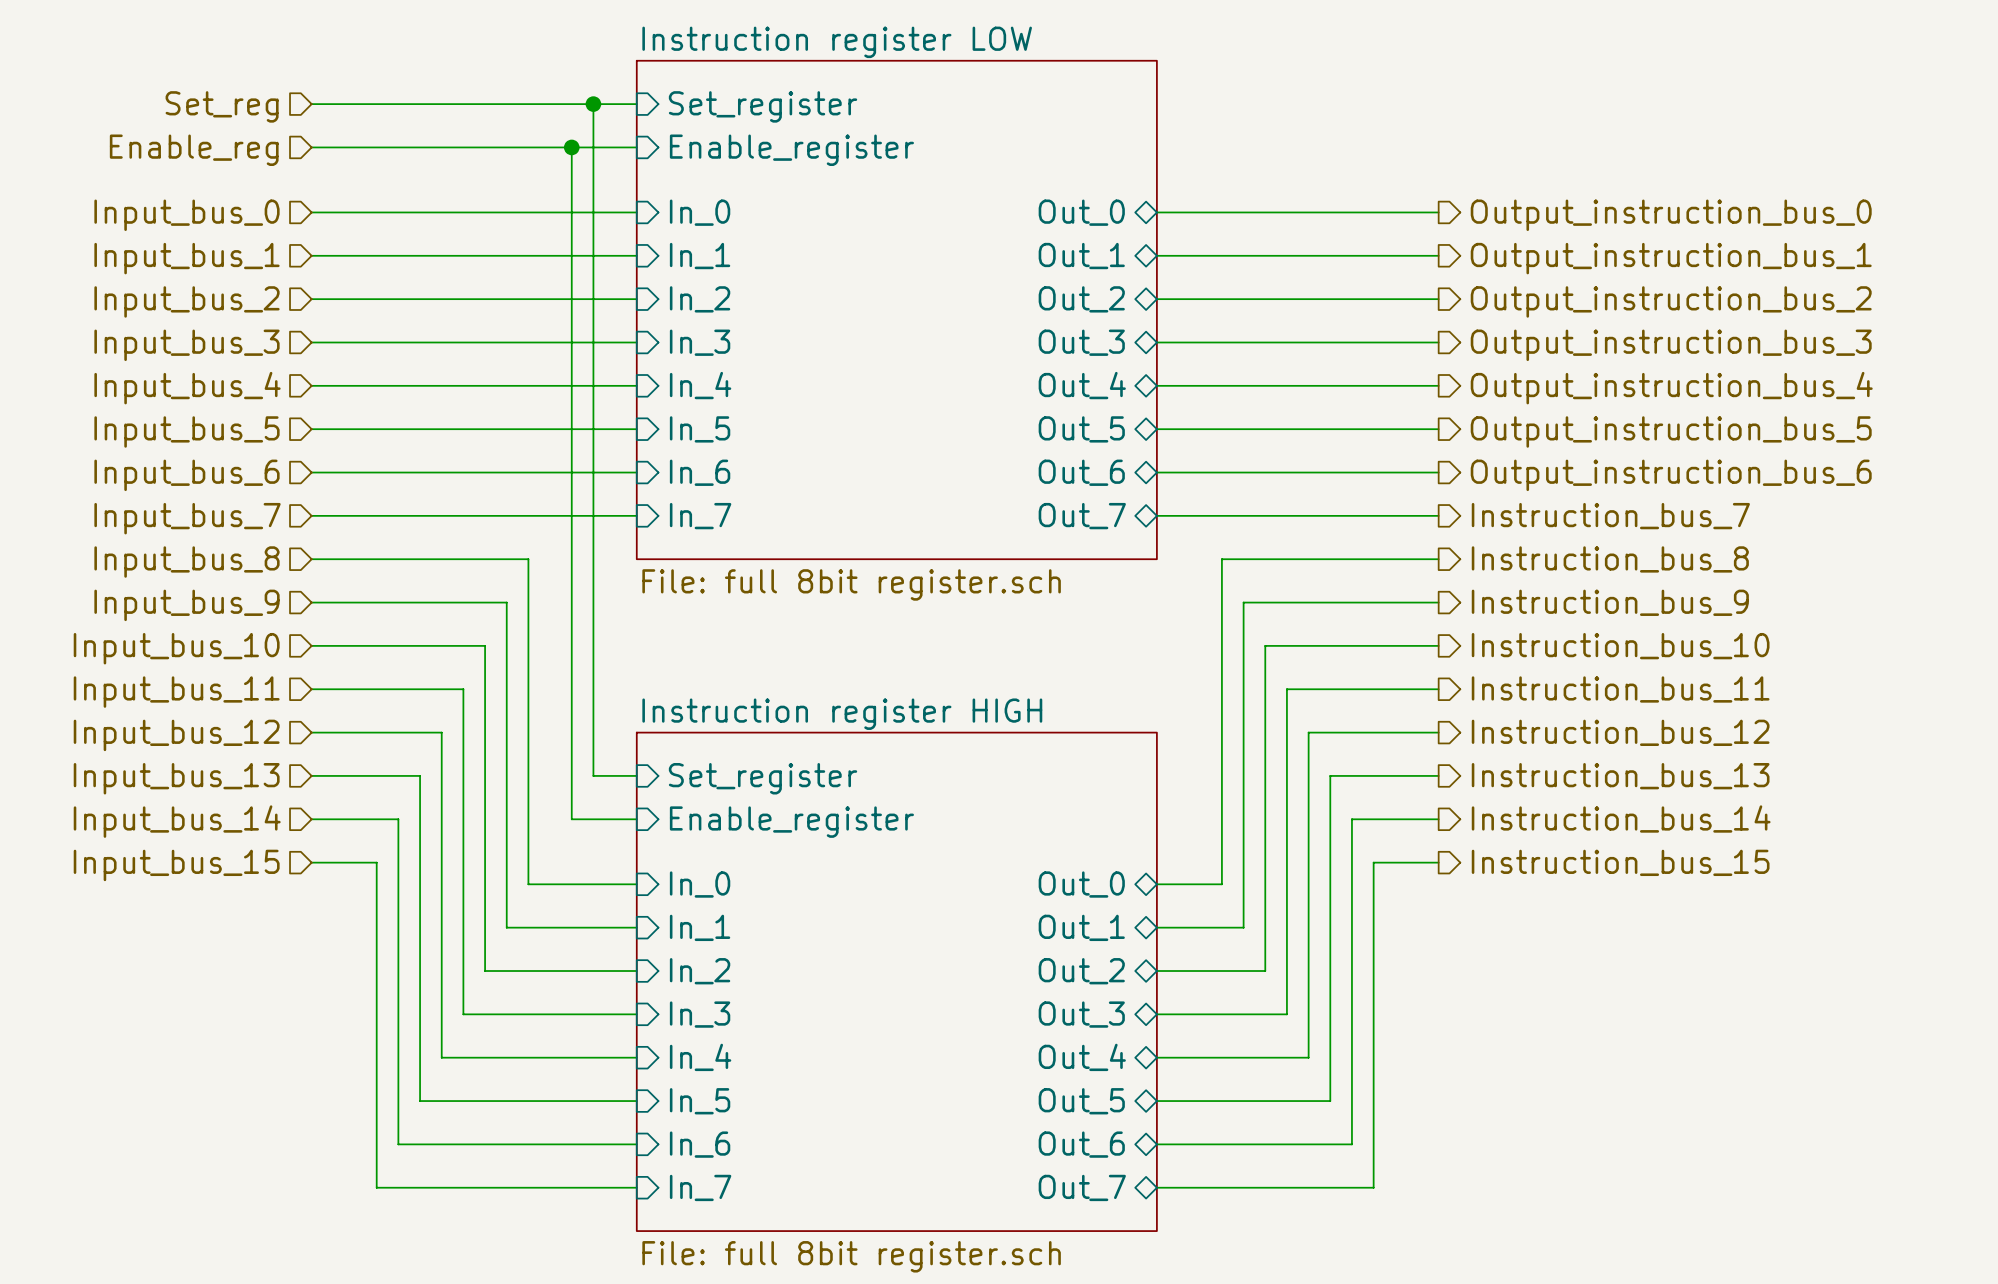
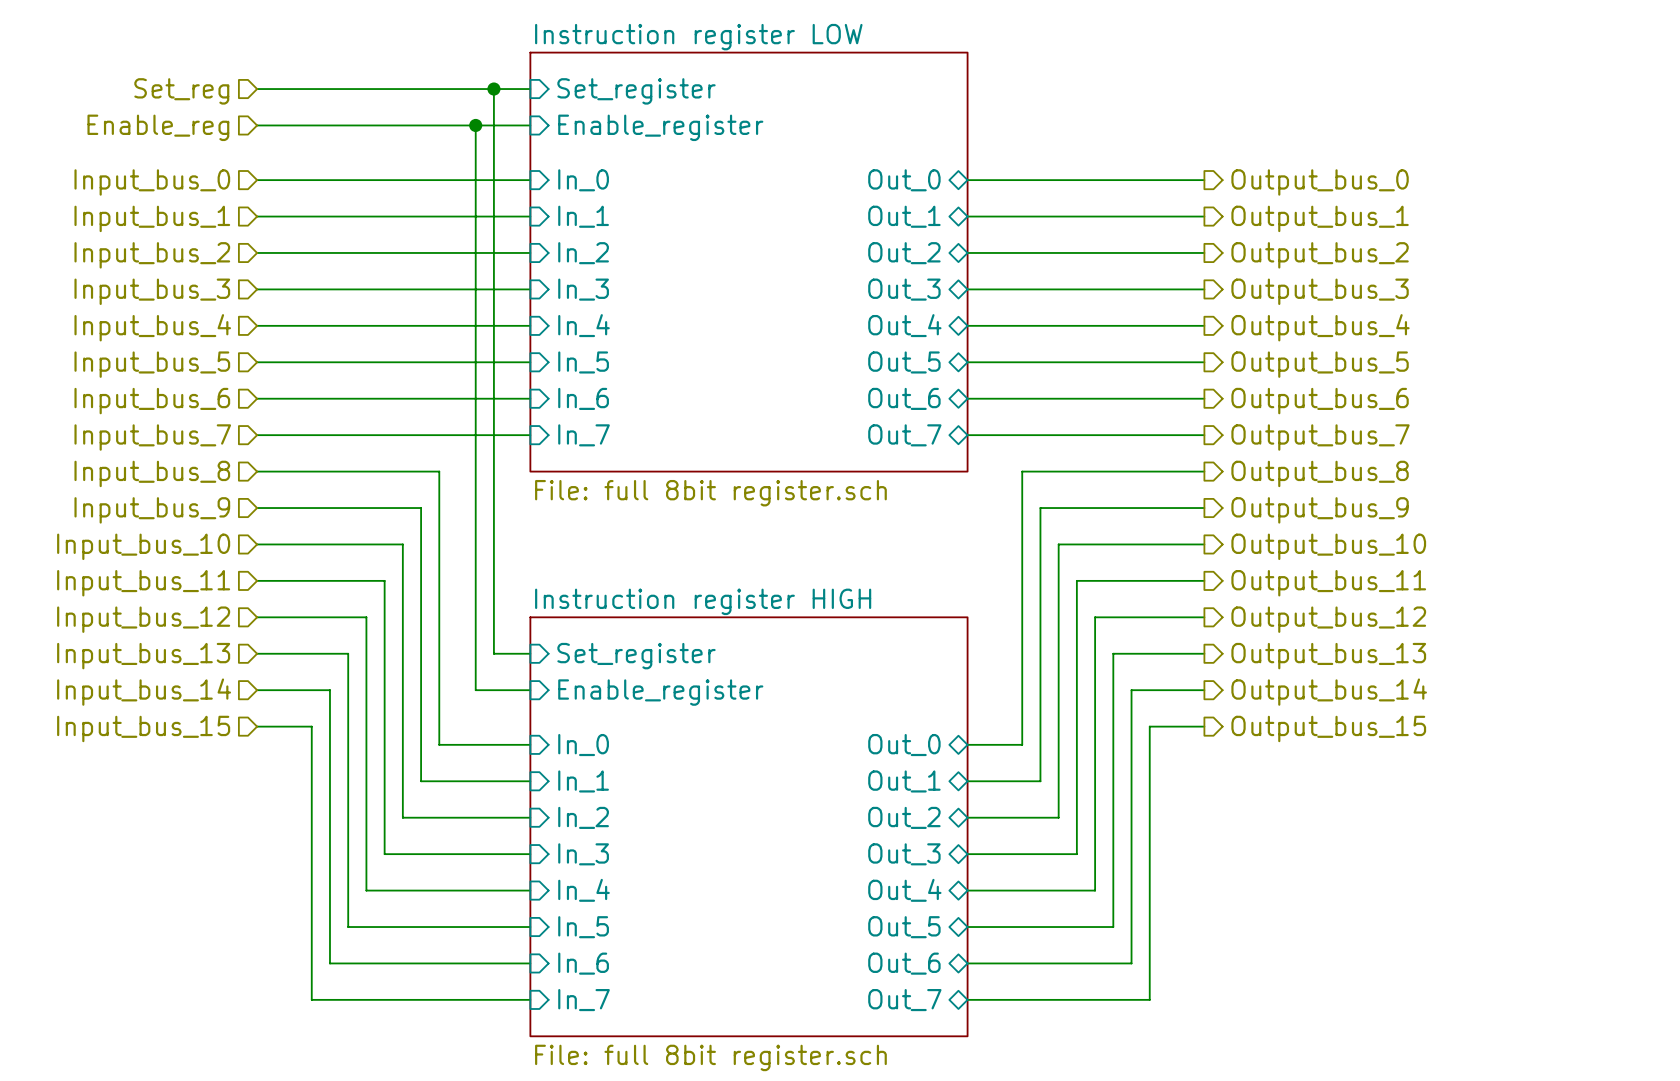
hierarchical label: Output_instruction_bus_0 (1671, 215) -> Output_bus_0 (1320, 182)
hierarchical label: Output_instruction_bus_1 (1671, 258) -> Output_bus_1 (1320, 218)
hierarchical label: Output_instruction_bus_2 (1671, 301) -> Output_bus_2 (1320, 255)
hierarchical label: Output_instruction_bus_3 (1671, 345) -> Output_bus_3 (1320, 291)
hierarchical label: Output_instruction_bus_4 (1671, 388) -> Output_bus_4 (1320, 327)
hierarchical label: Output_instruction_bus_5 (1671, 431) -> Output_bus_5 (1320, 364)
hierarchical label: Output_instruction_bus_6 (1671, 475) -> Output_bus_6 (1320, 401)
hierarchical label: Instruction_bus_7 (1610, 516) -> Output_bus_7 (1320, 437)
hierarchical label: Instruction_bus_8 (1610, 559) -> Output_bus_8 (1320, 473)
hierarchical label: Instruction_bus_9 (1610, 602) -> Output_bus_9 (1320, 510)
hierarchical label: Instruction_bus_10 (1620, 646) -> Output_bus_10 (1328, 546)
hierarchical label: Instruction_bus_11 (1620, 689) -> Output_bus_11 (1328, 583)
hierarchical label: Instruction_bus_12 (1620, 732) -> Output_bus_12 (1328, 619)
hierarchical label: Instruction_bus_13 (1620, 776) -> Output_bus_13 (1328, 656)
hierarchical label: Instruction_bus_14 (1621, 819) -> Output_bus_14 (1329, 692)
hierarchical label: Instruction_bus_15 (1620, 862) -> Output_bus_15 (1328, 728)

